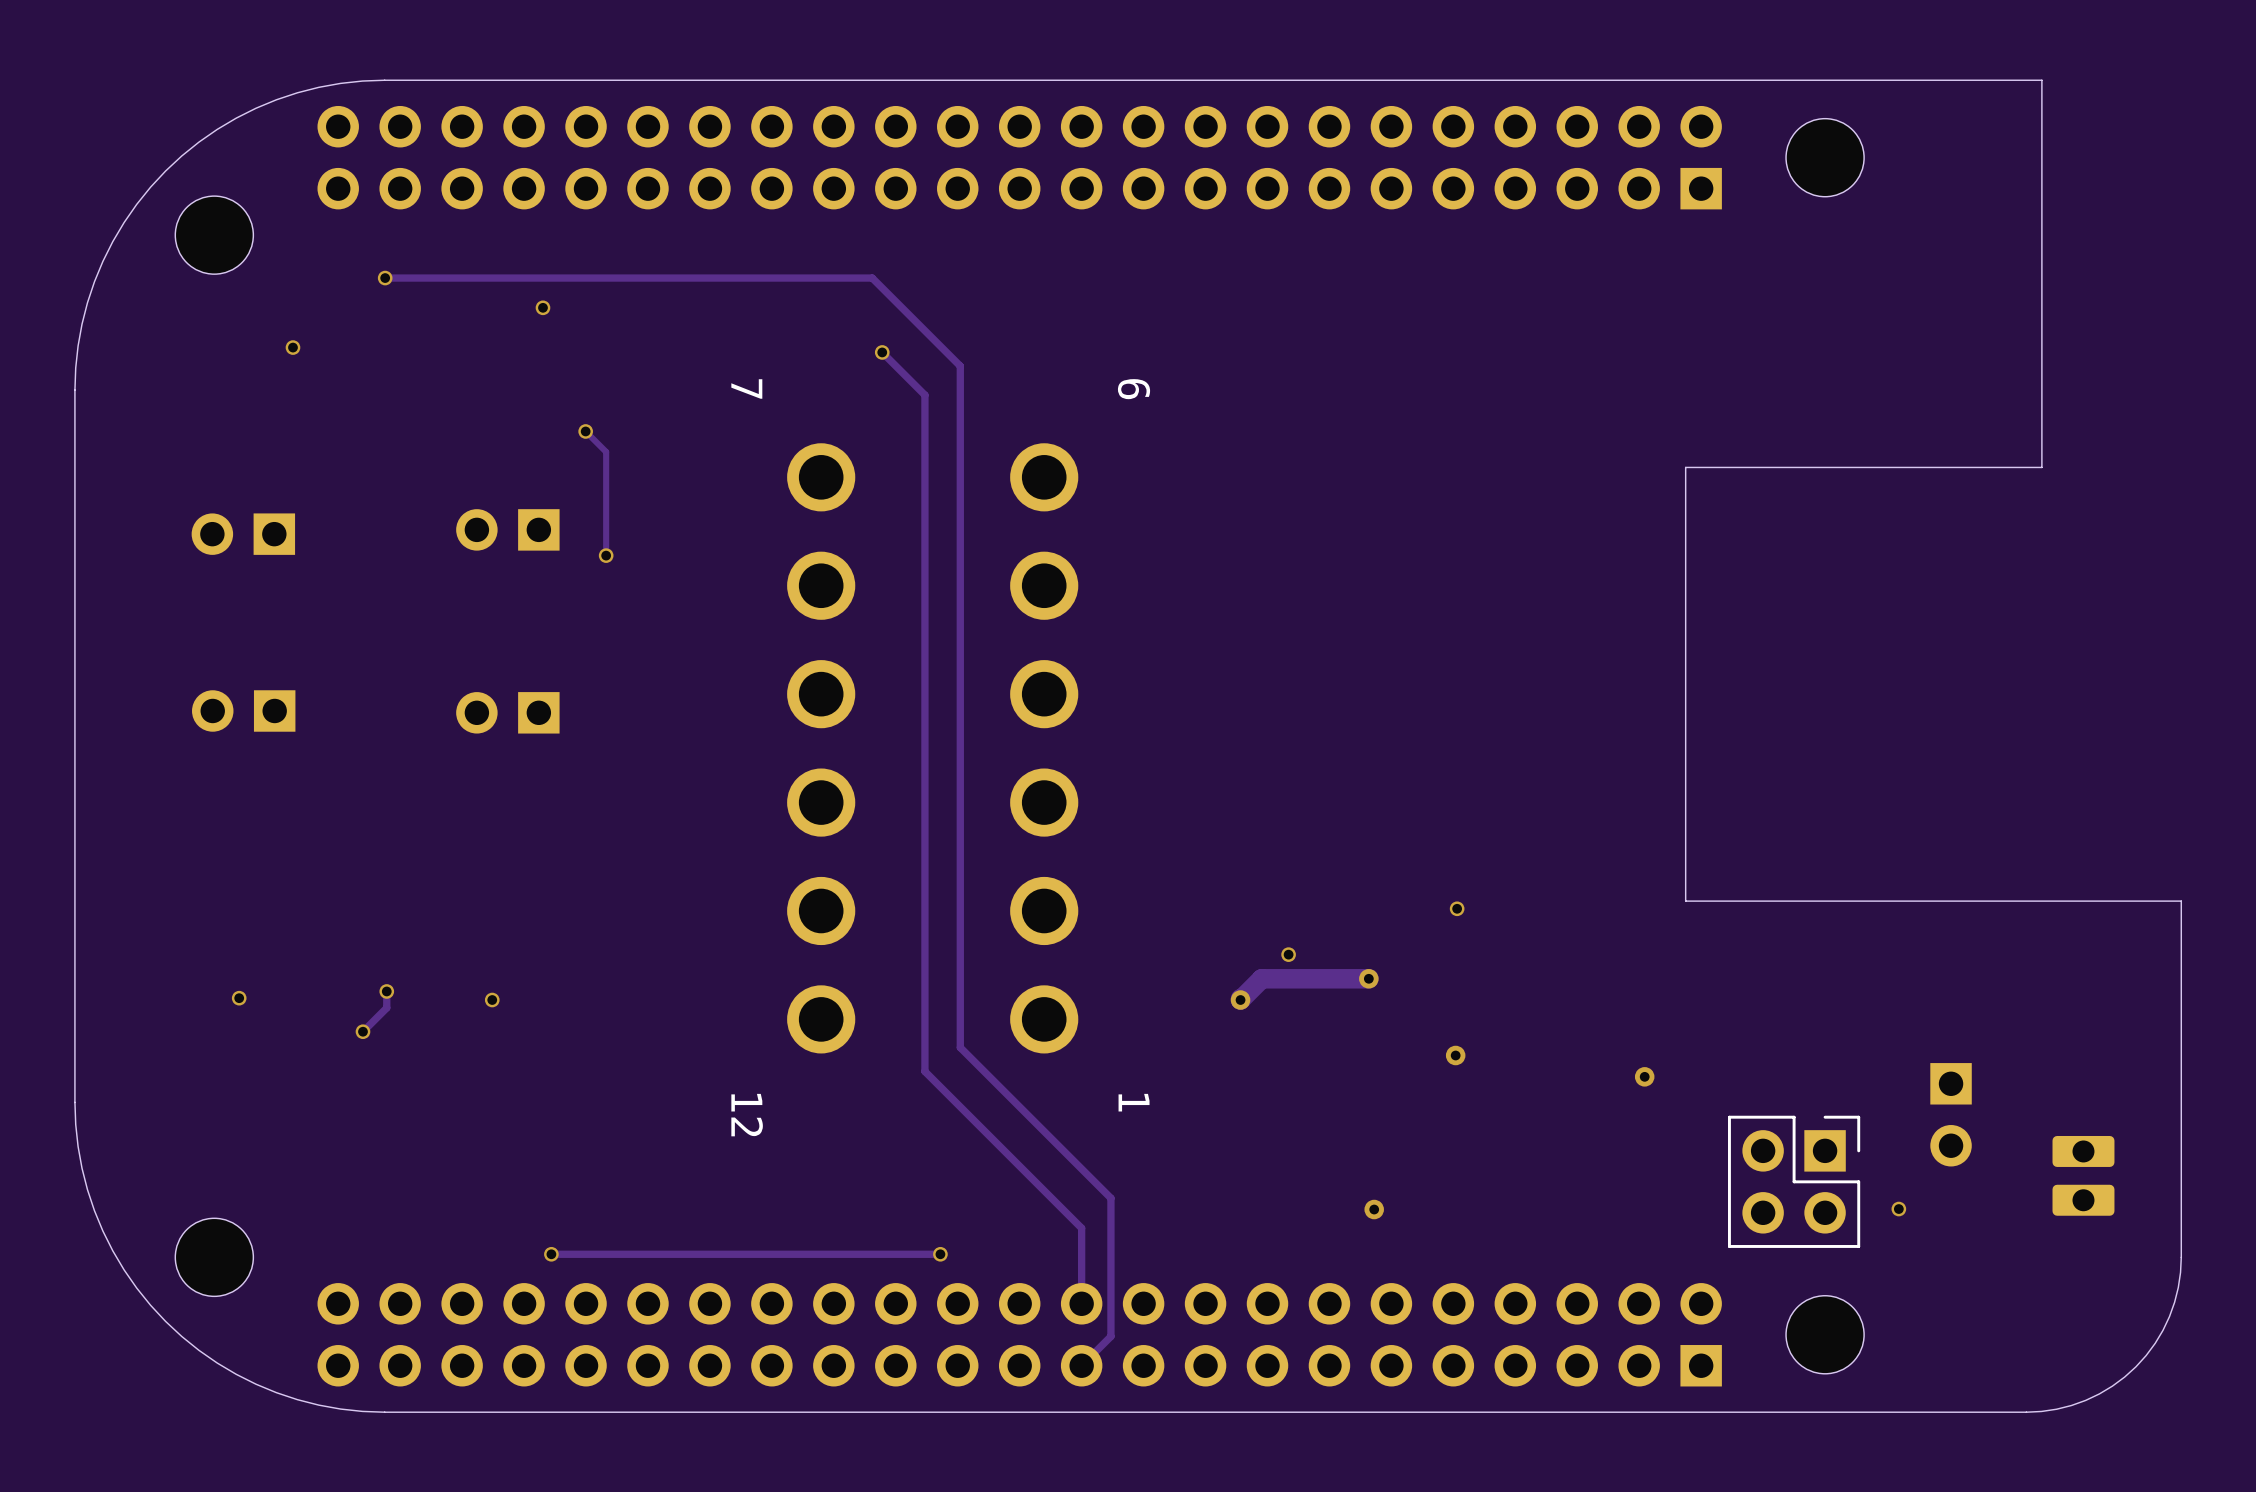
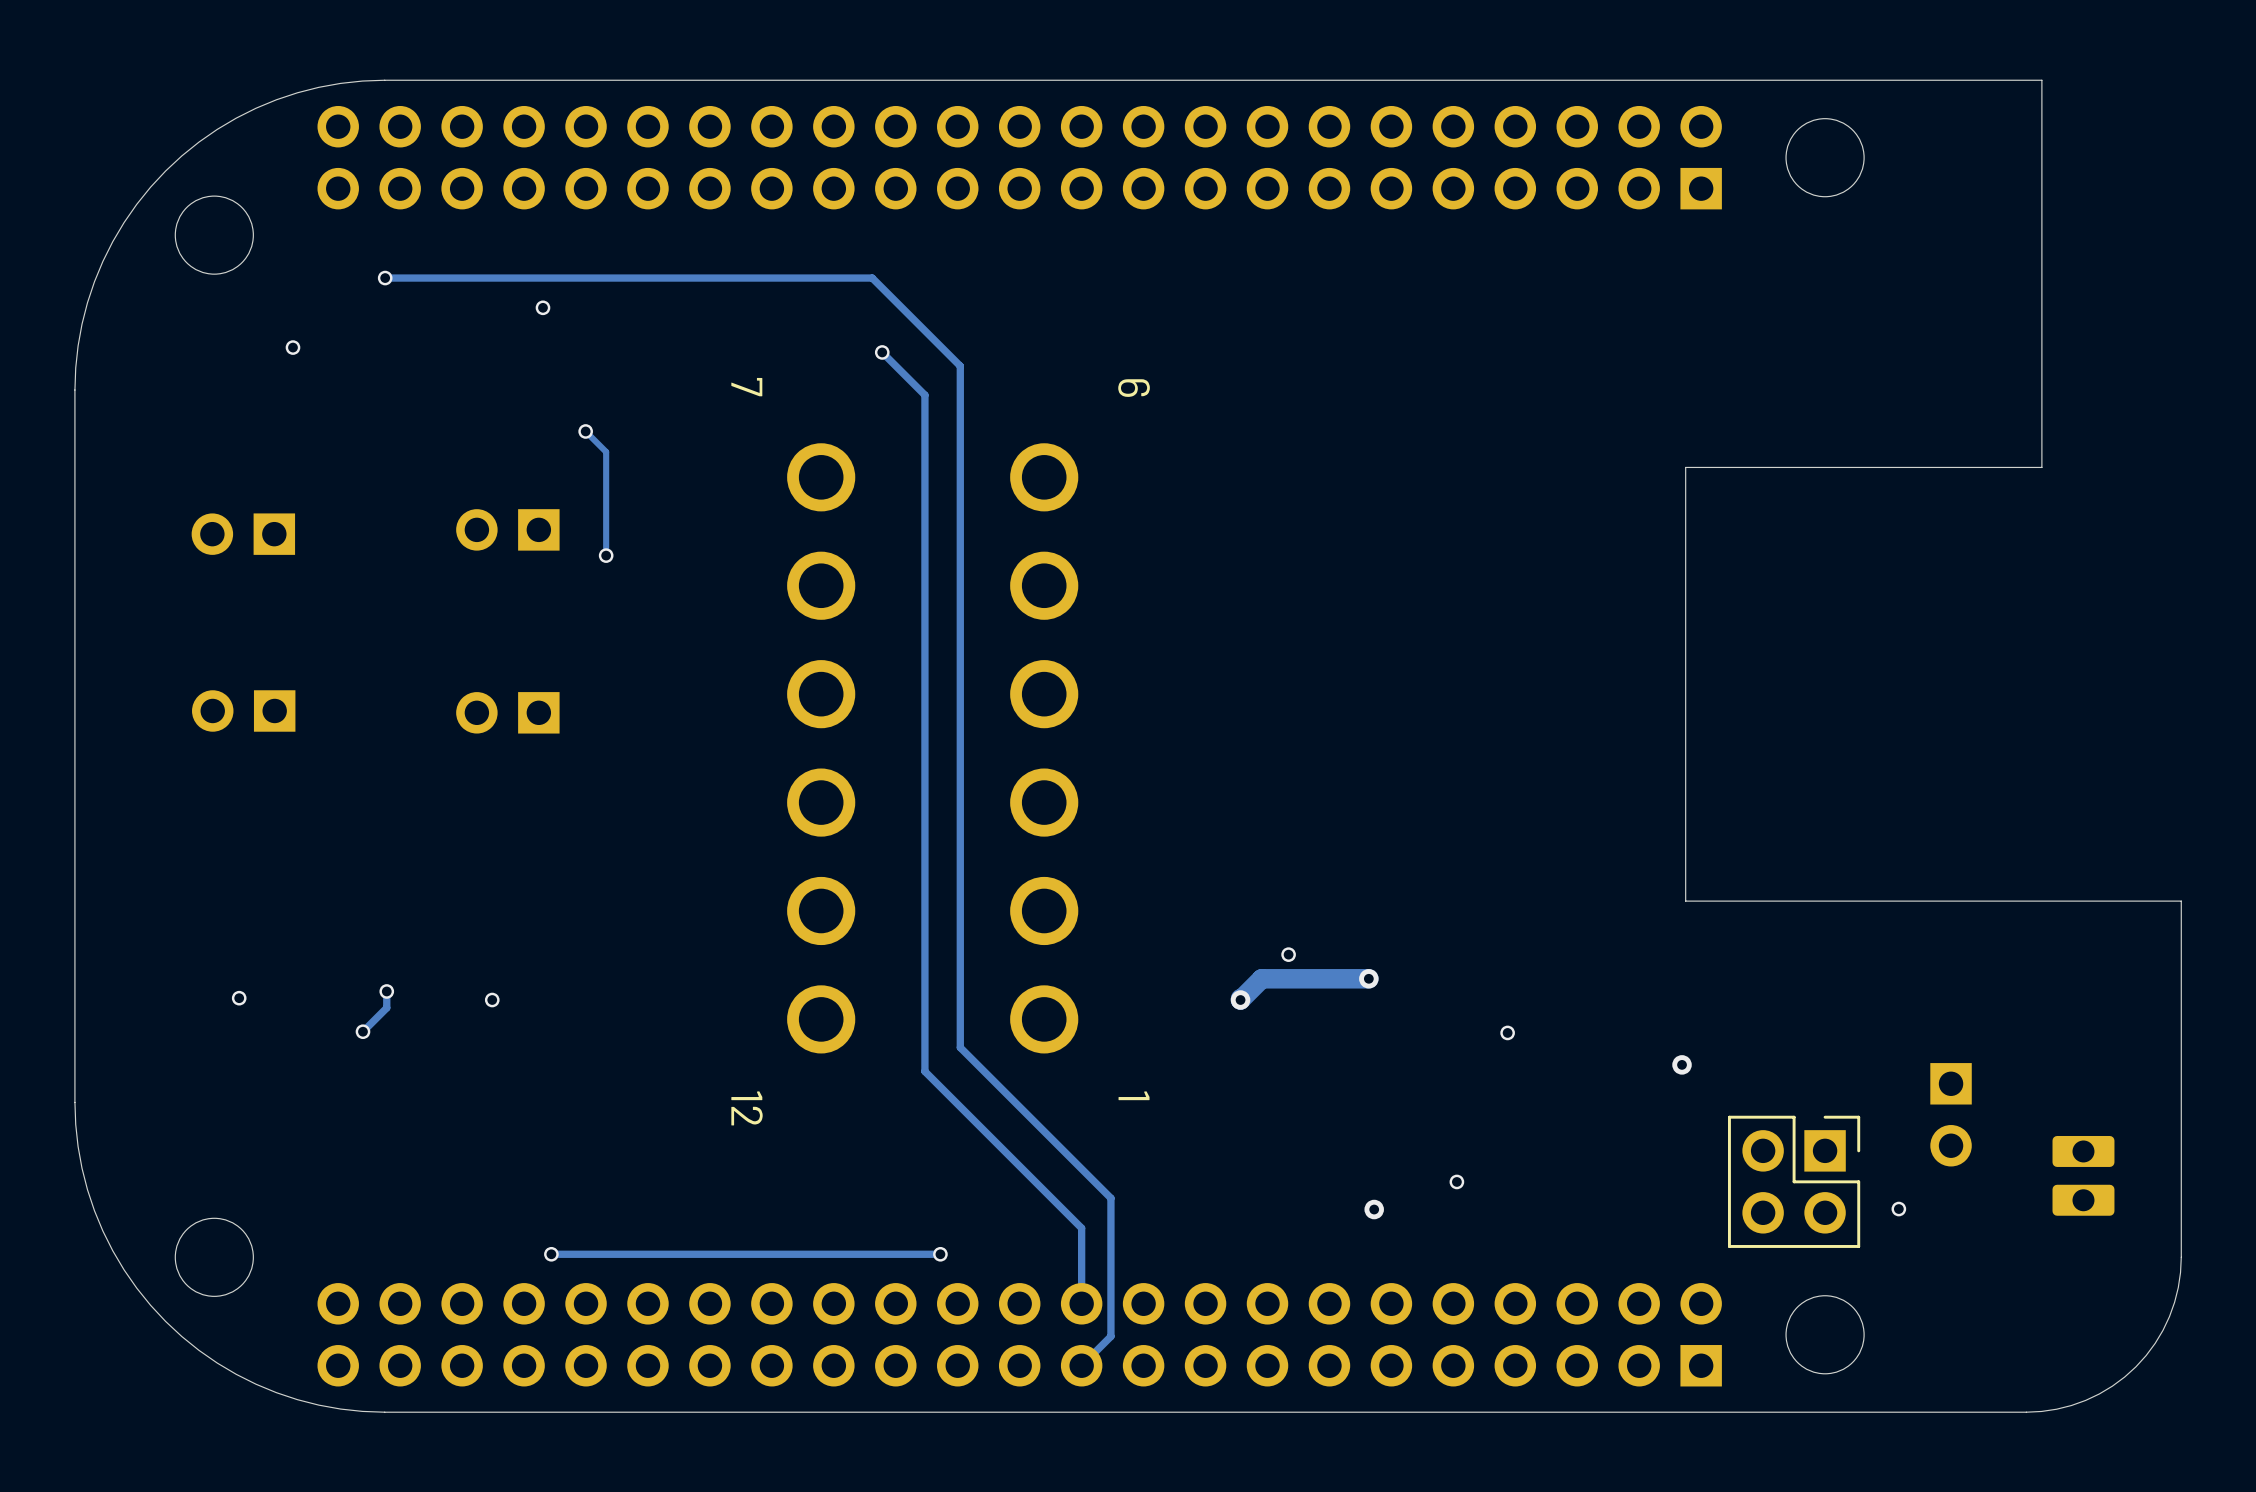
via position: (1457, 908) -> (1507, 1032)
via: (1455, 1055) -> none
via position: (1644, 1076) -> (1682, 1064)
via: none -> (1456, 1181)

